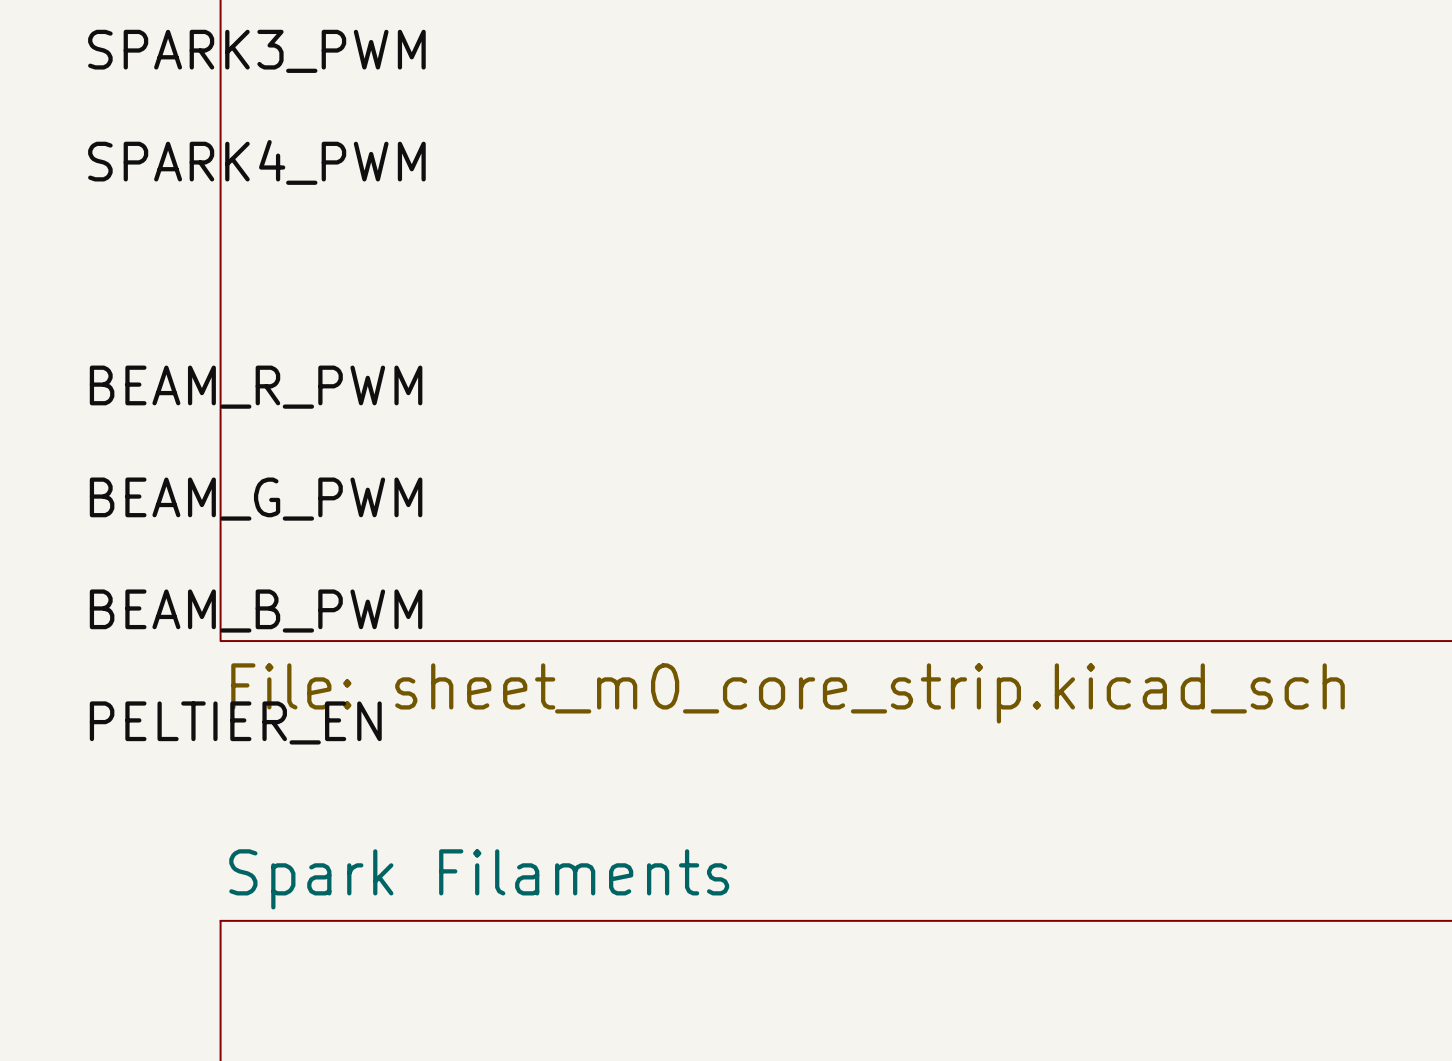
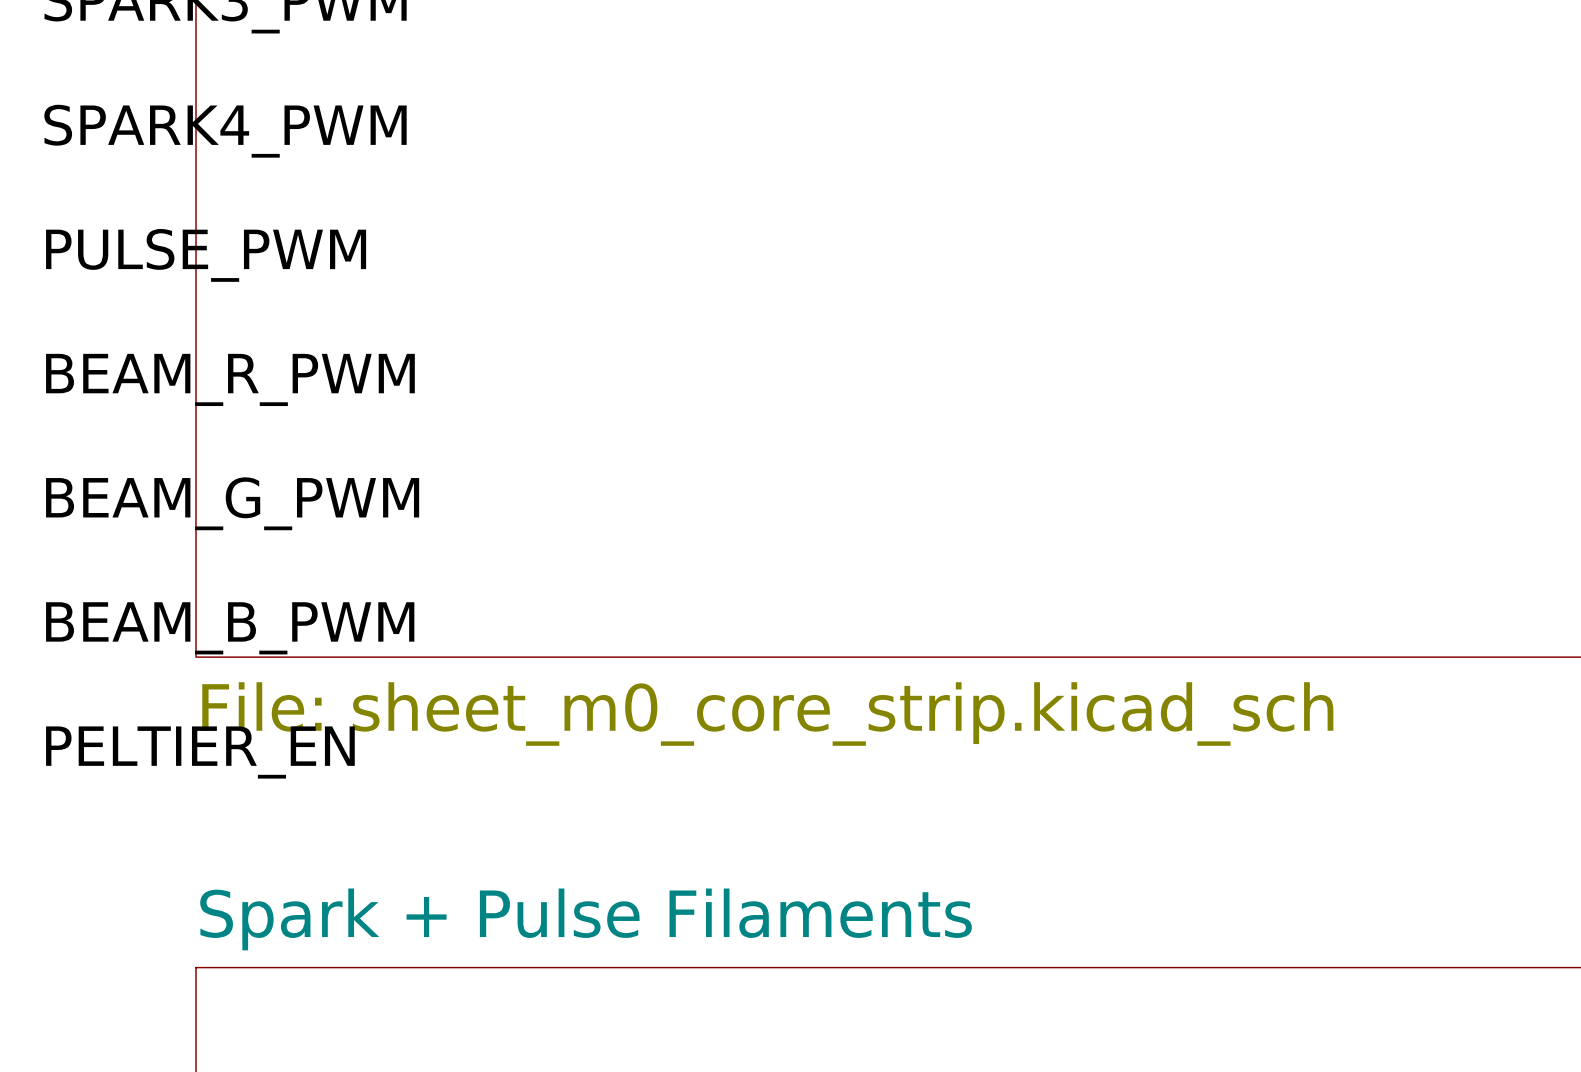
label: none -> PULSE_PWM (206, 255)
sheet Spark Filaments name: Spark Filaments (479, 879) -> Spark + Pulse Filaments (586, 919)

